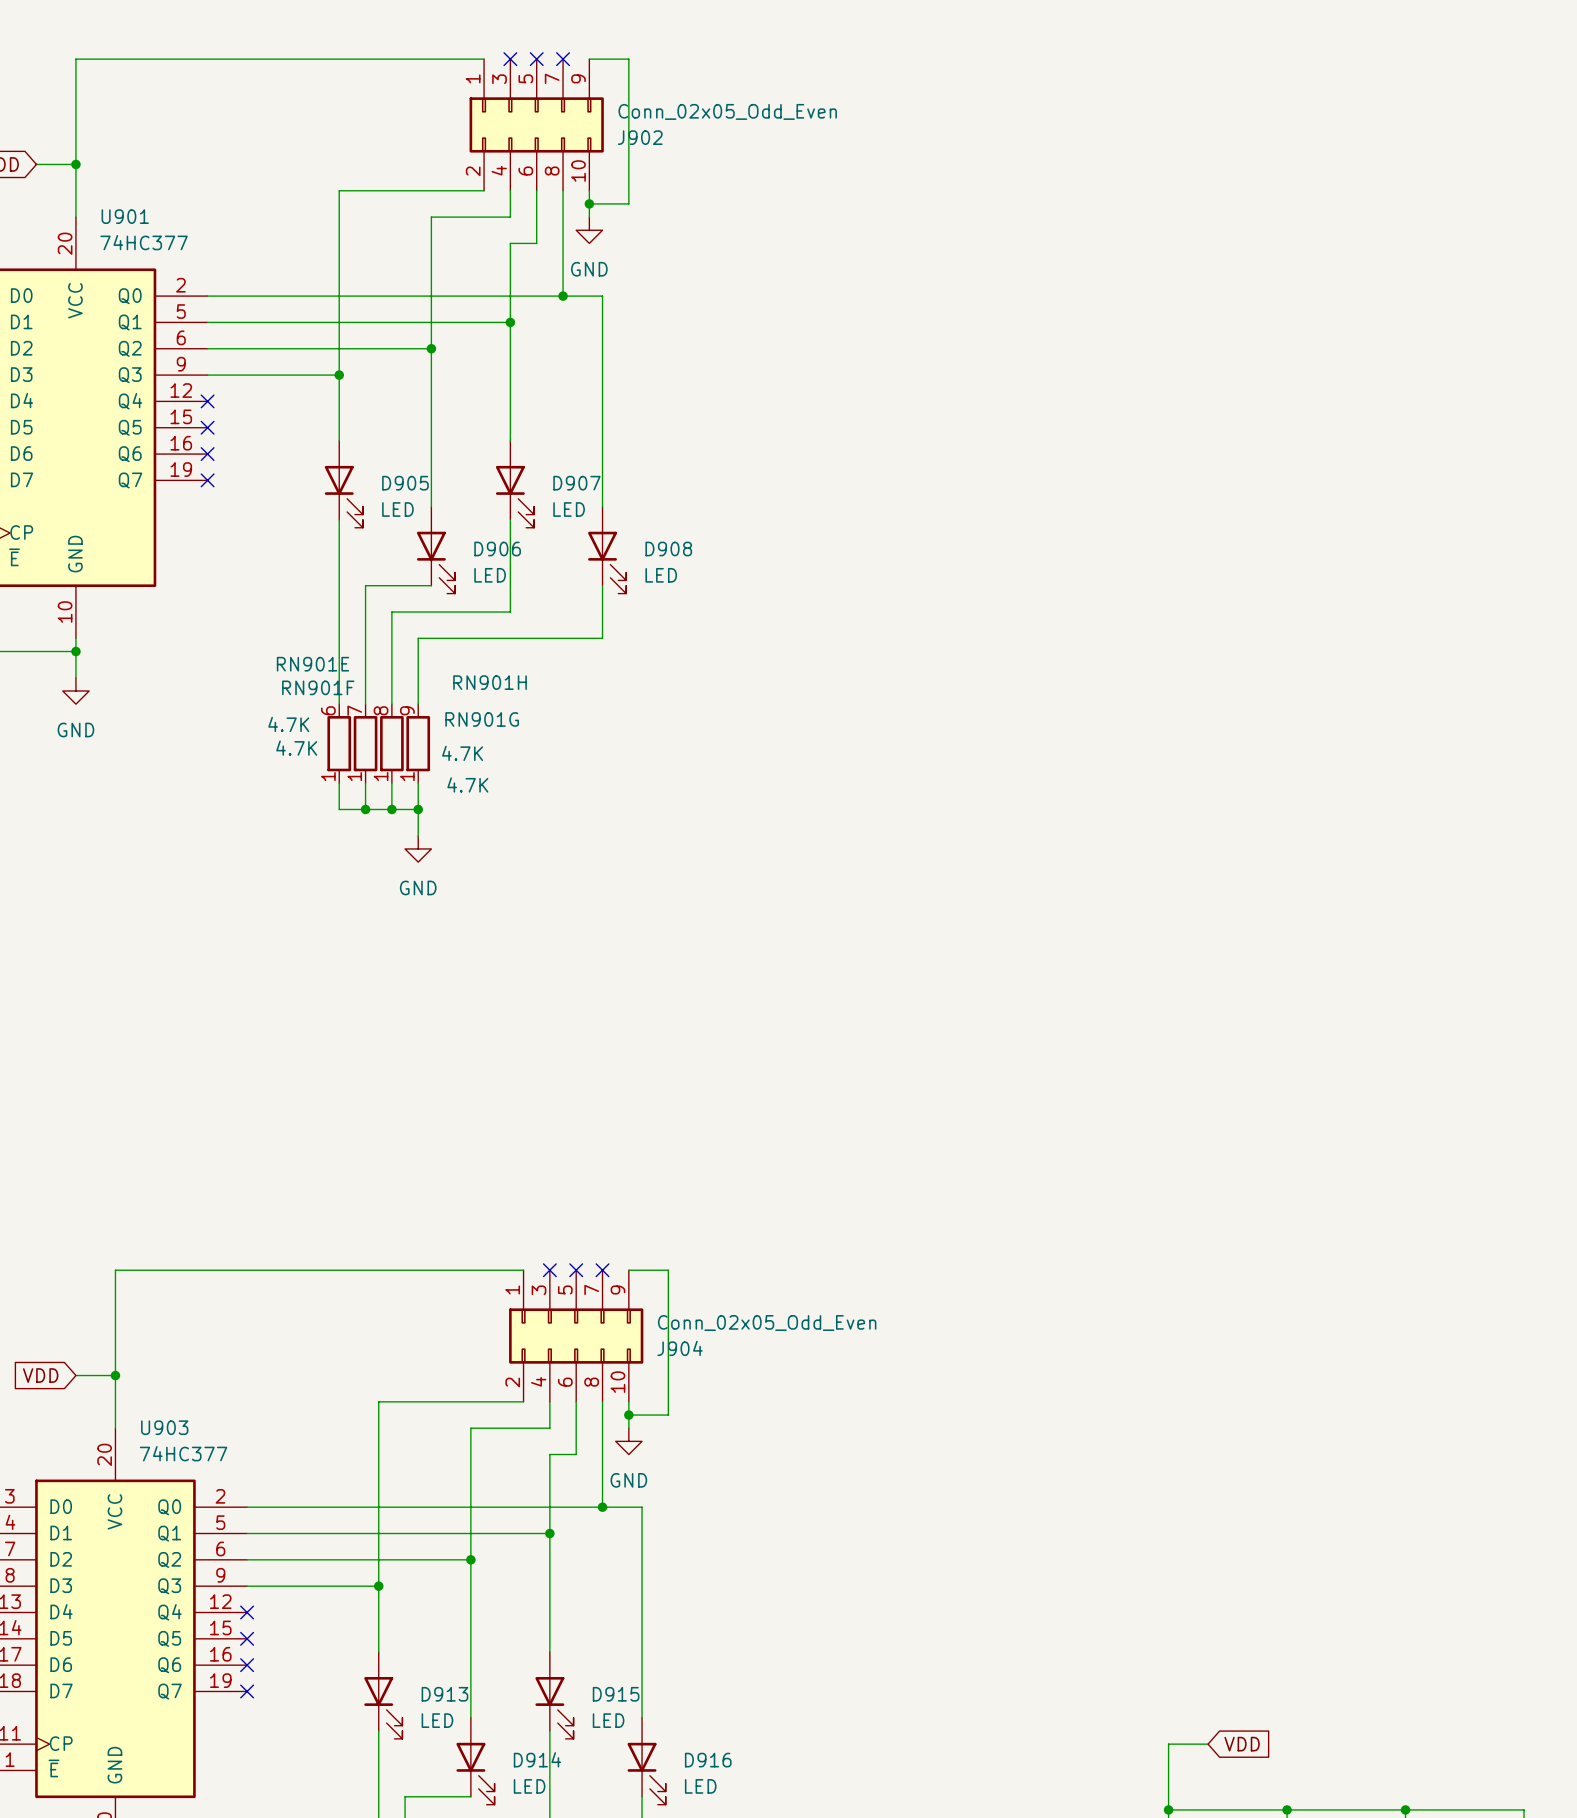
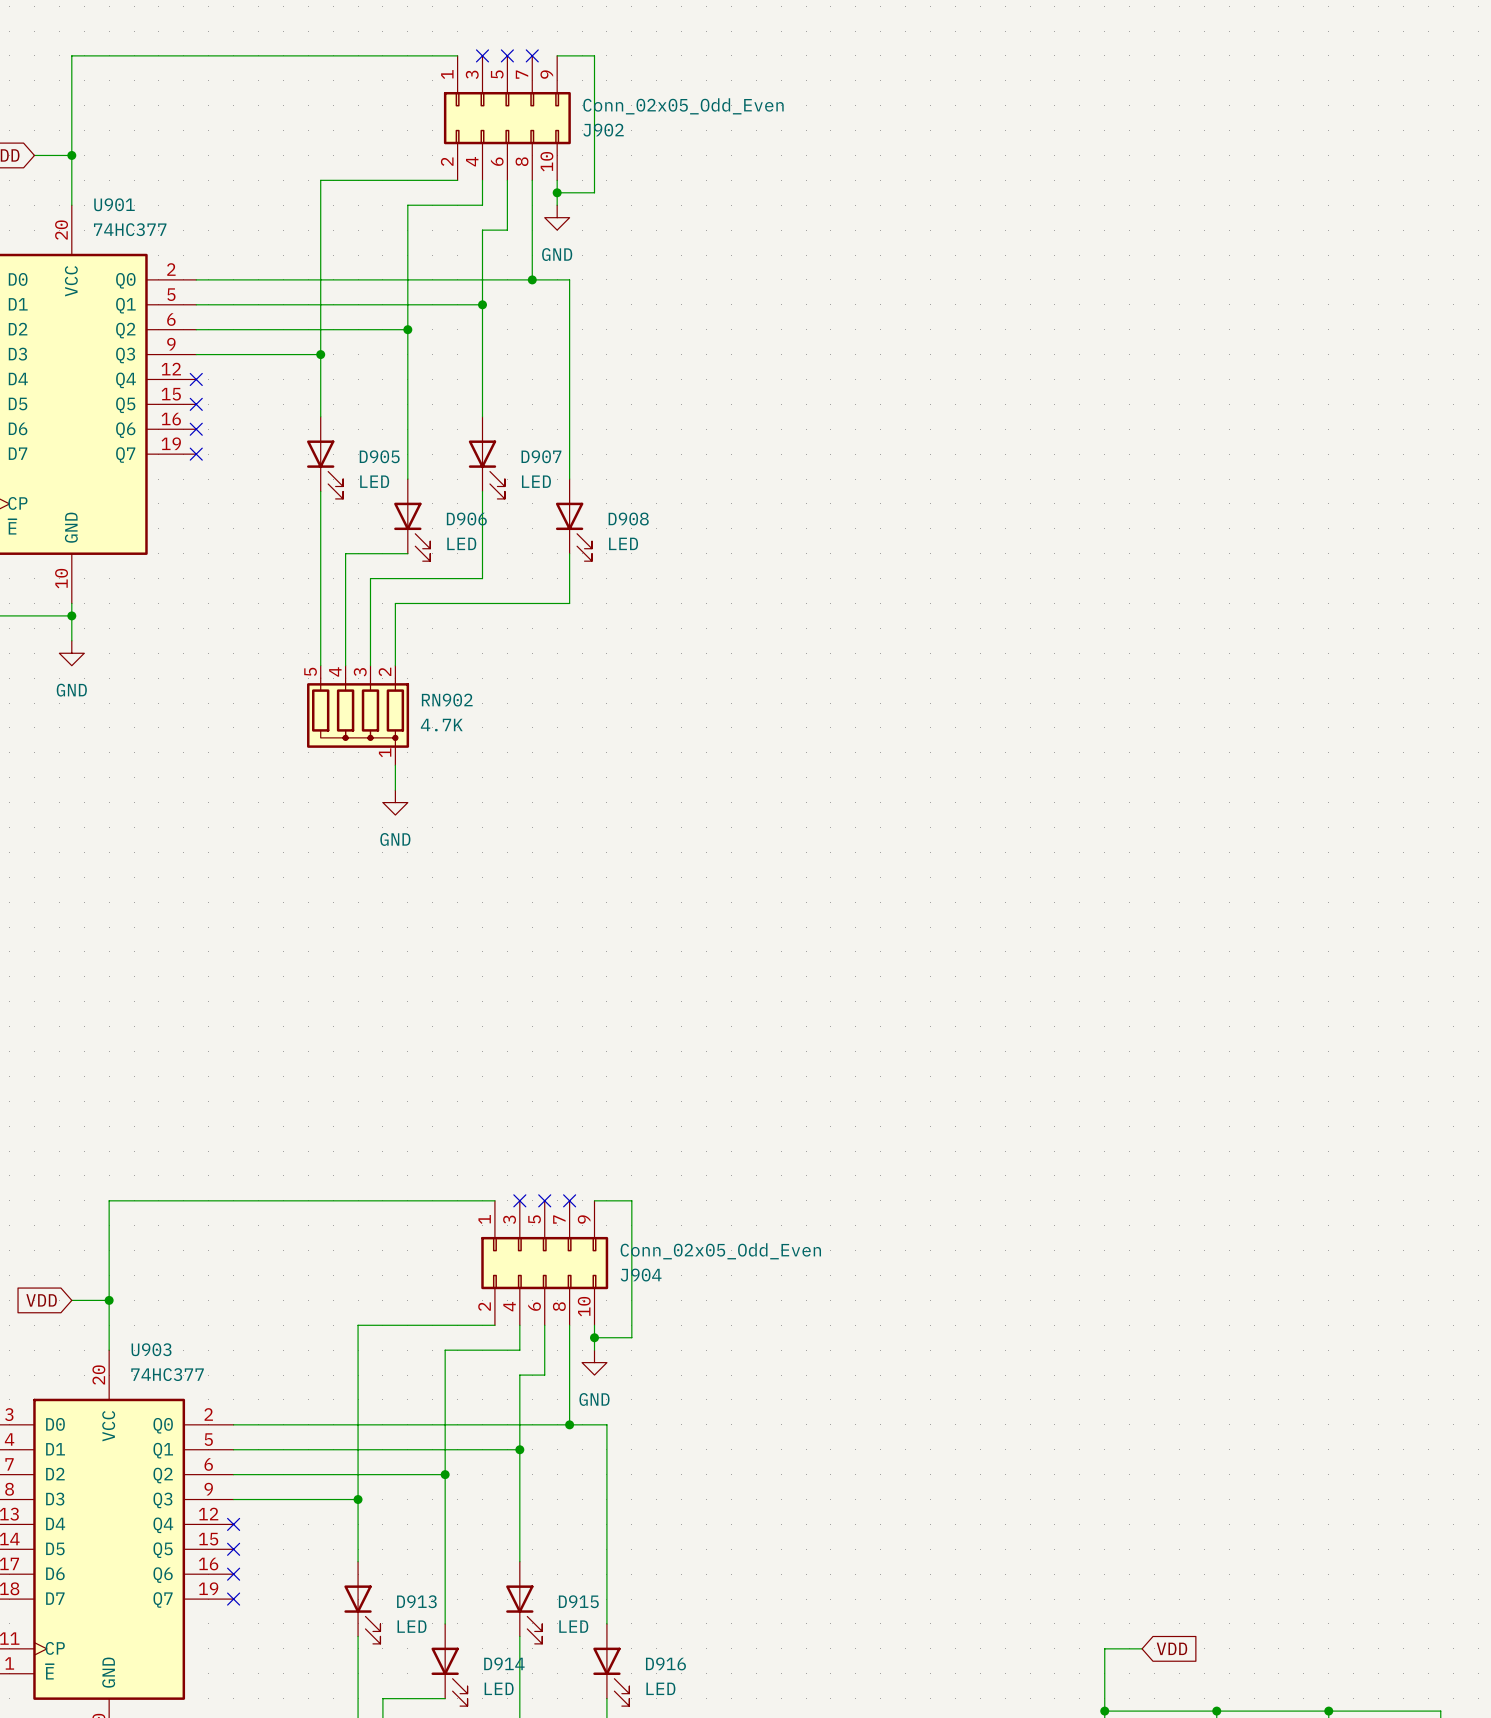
RN901E: 4.7K (339, 743) -> none
RN901F: 4.7K (365, 743) -> none
RN901G: 4.7K (391, 743) -> none
RN901H: 4.7K (418, 743) -> none
RN902: none -> 4.7K (358, 715)
wire: (339, 783) (339, 809) (418, 809) (418, 783) -> none
wire: (365, 783) (365, 809) -> none
wire: (391, 783) (391, 809) -> none
junction: (365, 809) -> none
junction: (391, 809) -> none
junction: (418, 809) -> none

